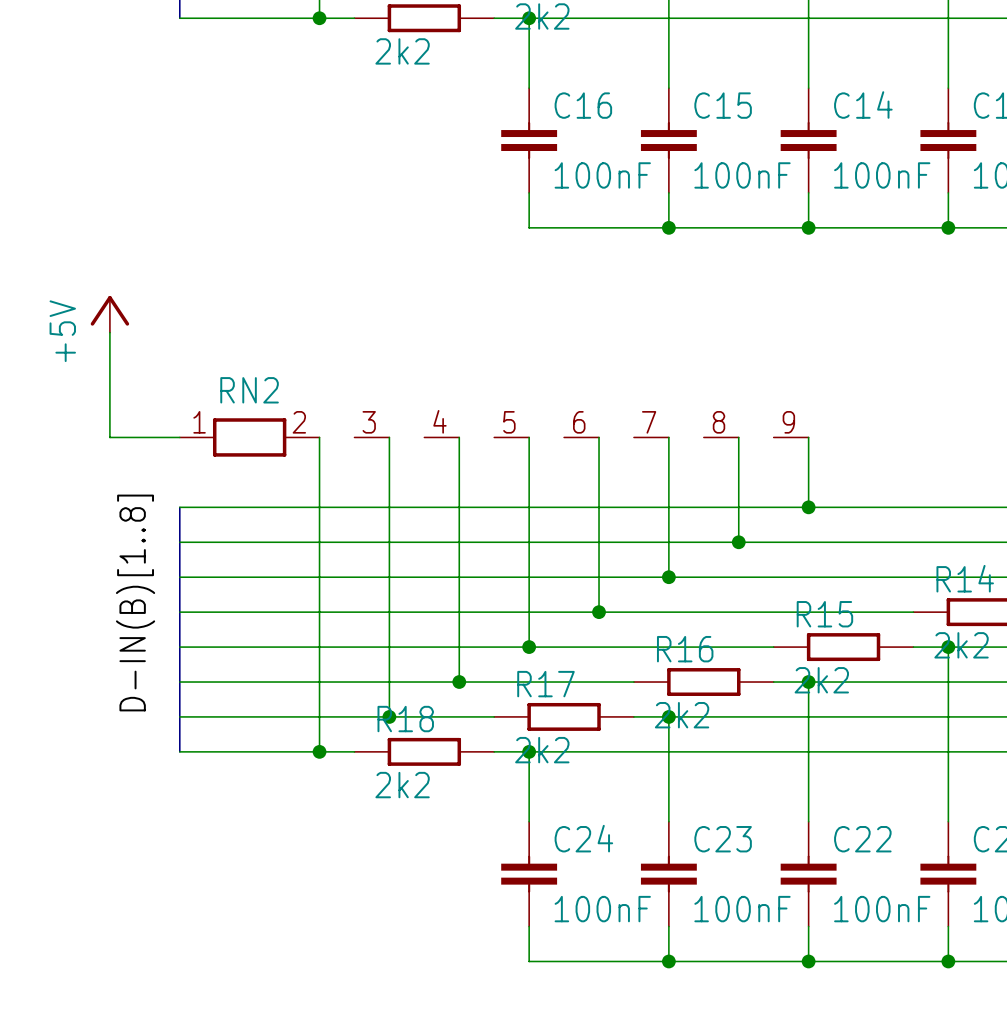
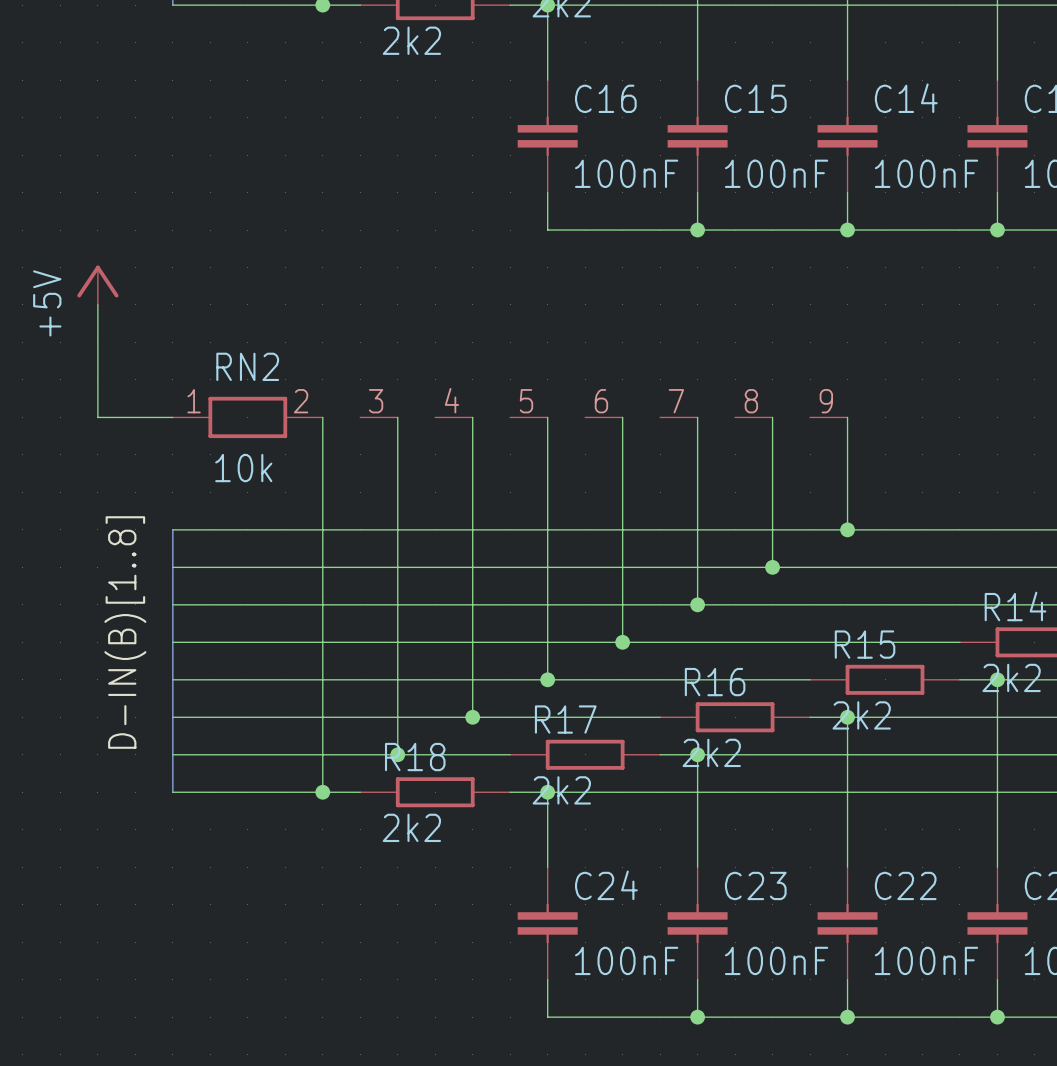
power symbol position: +5V (109, 314) -> +5V (97, 285)
wire: (109, 402) (109, 437) (179, 437) -> (97, 417) (172, 417)
wire: none -> (322, 417) (322, 454)
wire: none -> (397, 417) (397, 454)
wire: none -> (472, 417) (472, 454)
wire: none -> (547, 417) (547, 454)
wire: none -> (622, 417) (622, 454)
wire: none -> (697, 417) (697, 454)
wire: none -> (772, 417) (772, 454)
wire: none -> (847, 417) (847, 454)
RN2 position: (494, 437) -> (510, 417)
RN2 value: none -> 10k (243, 468)

